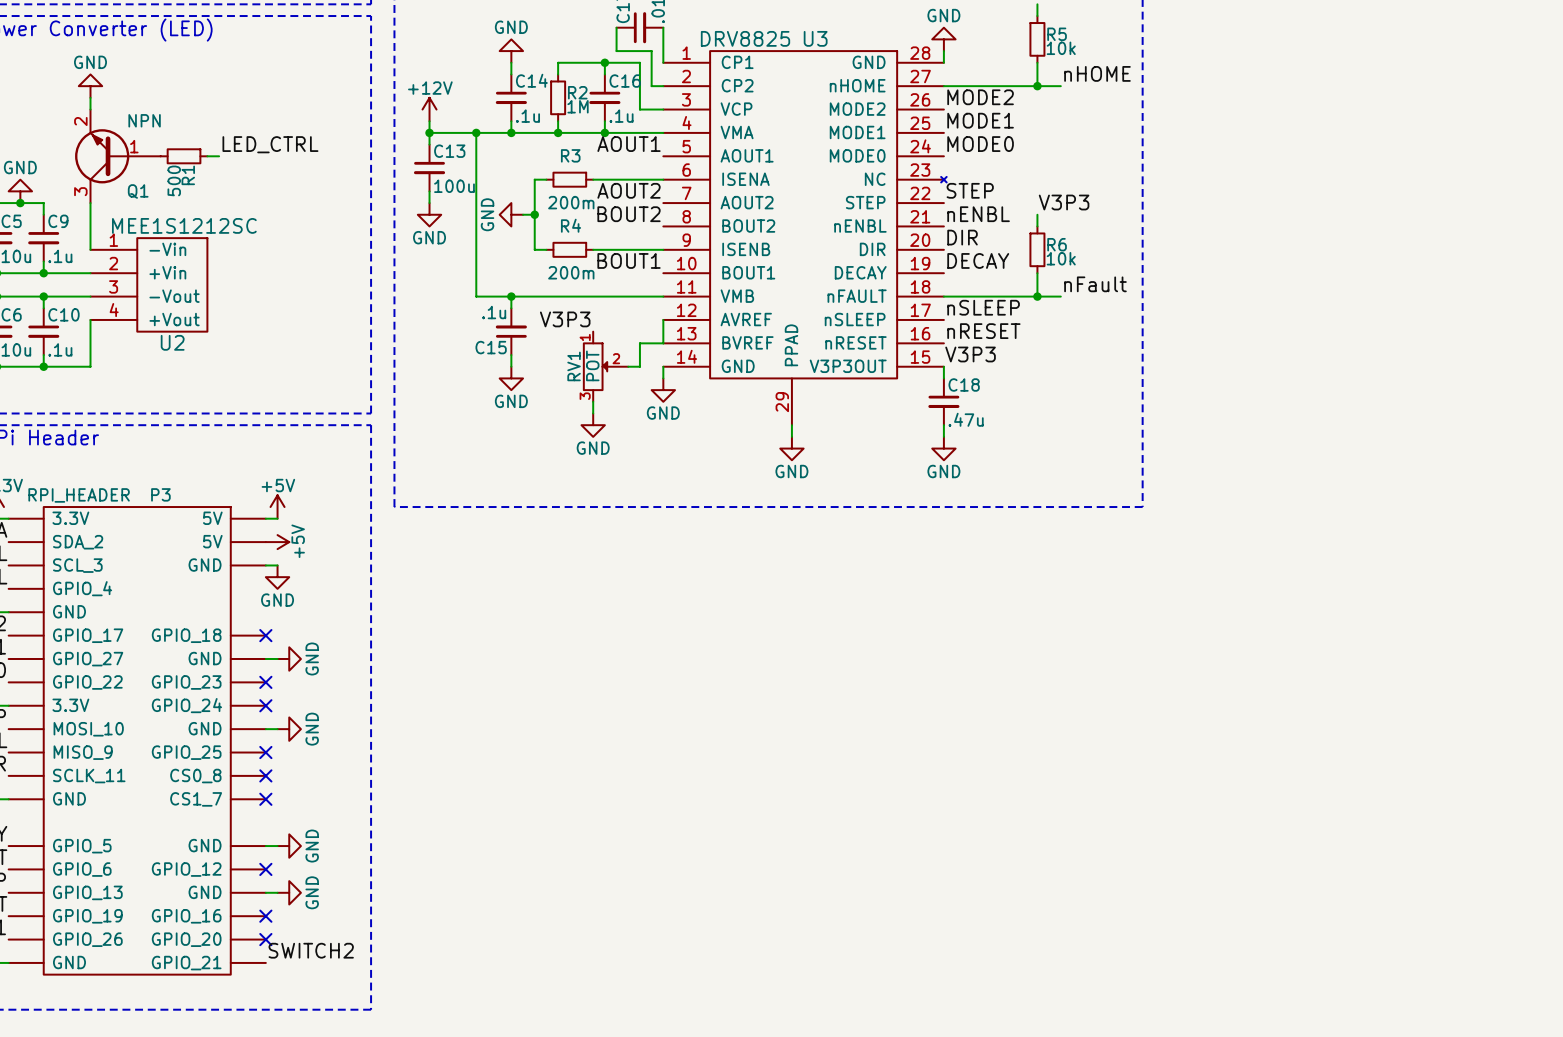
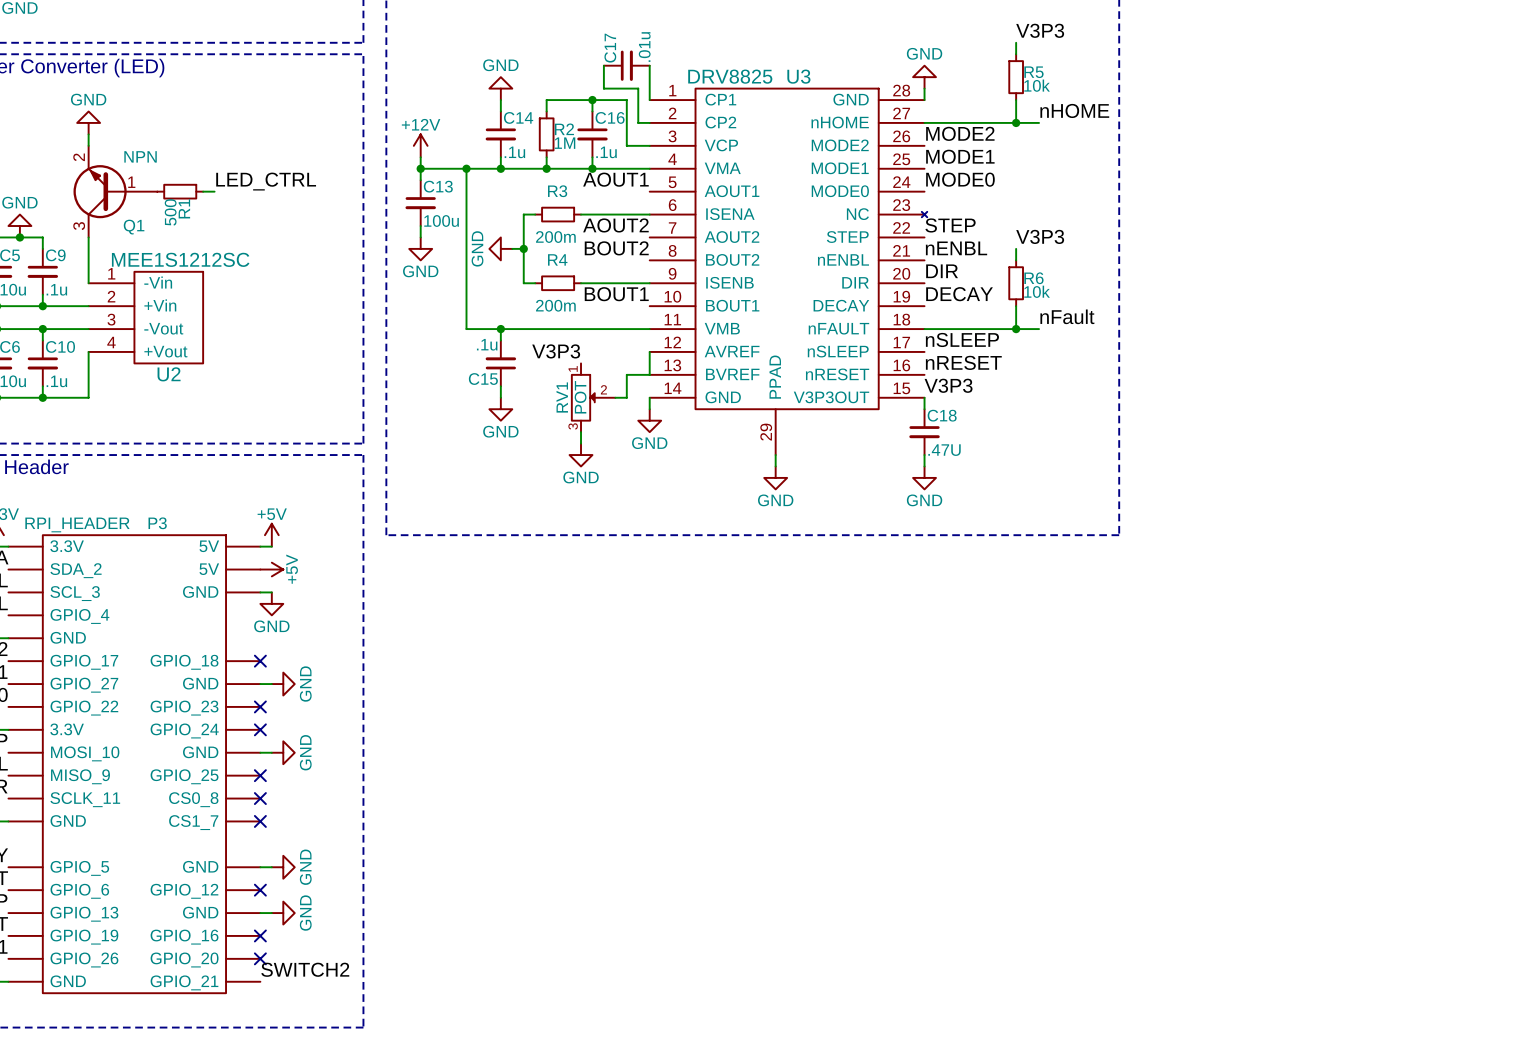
C18 value: .47u (966, 419) -> .47U (944, 450)

